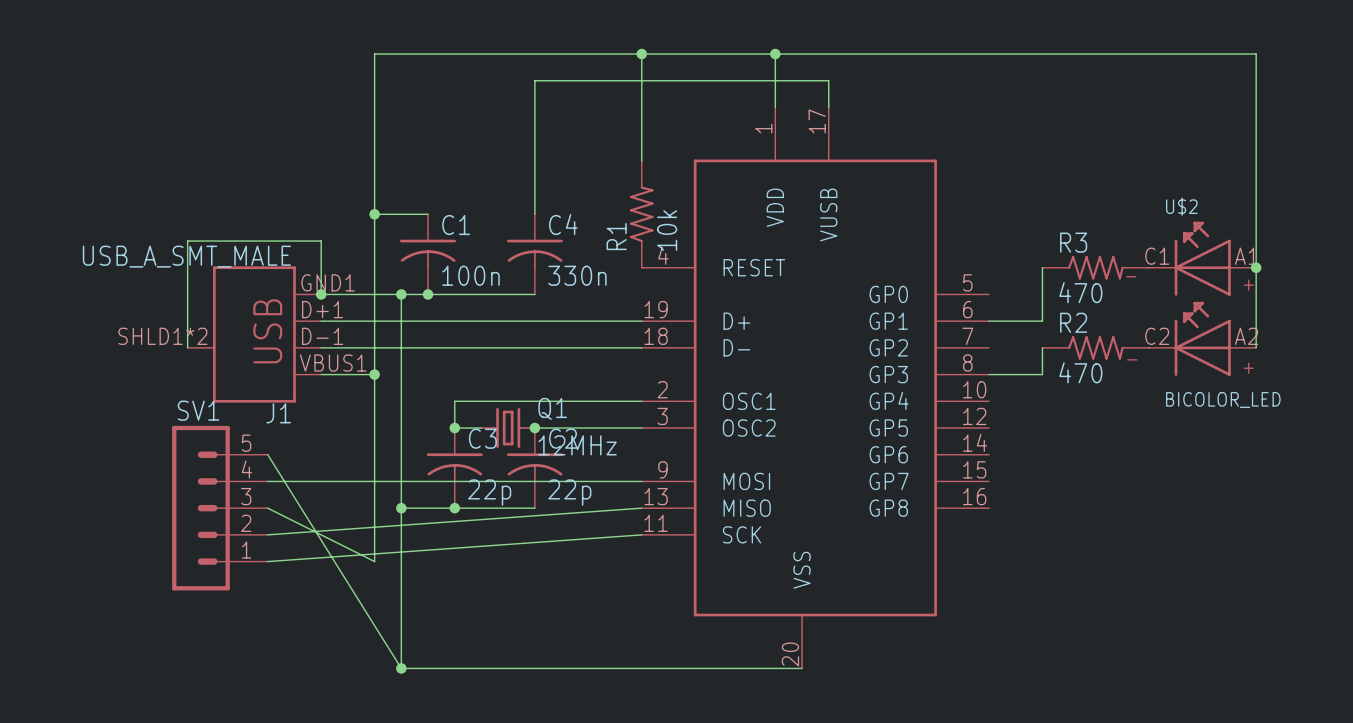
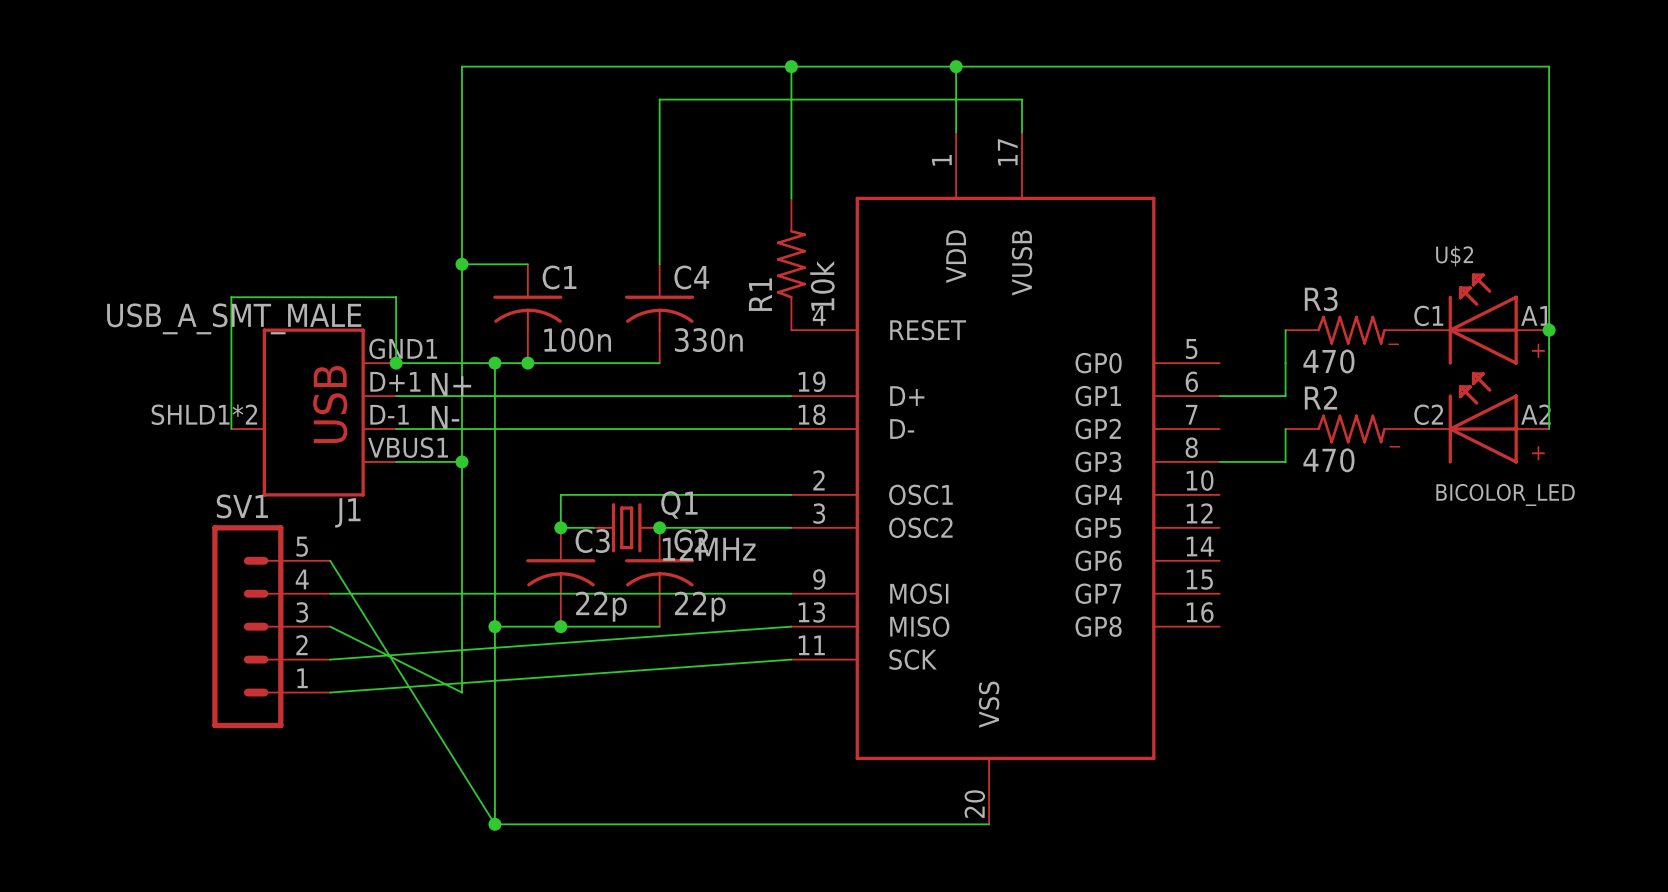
label: none -> N+ (451, 384)
label: none -> N- (445, 417)

